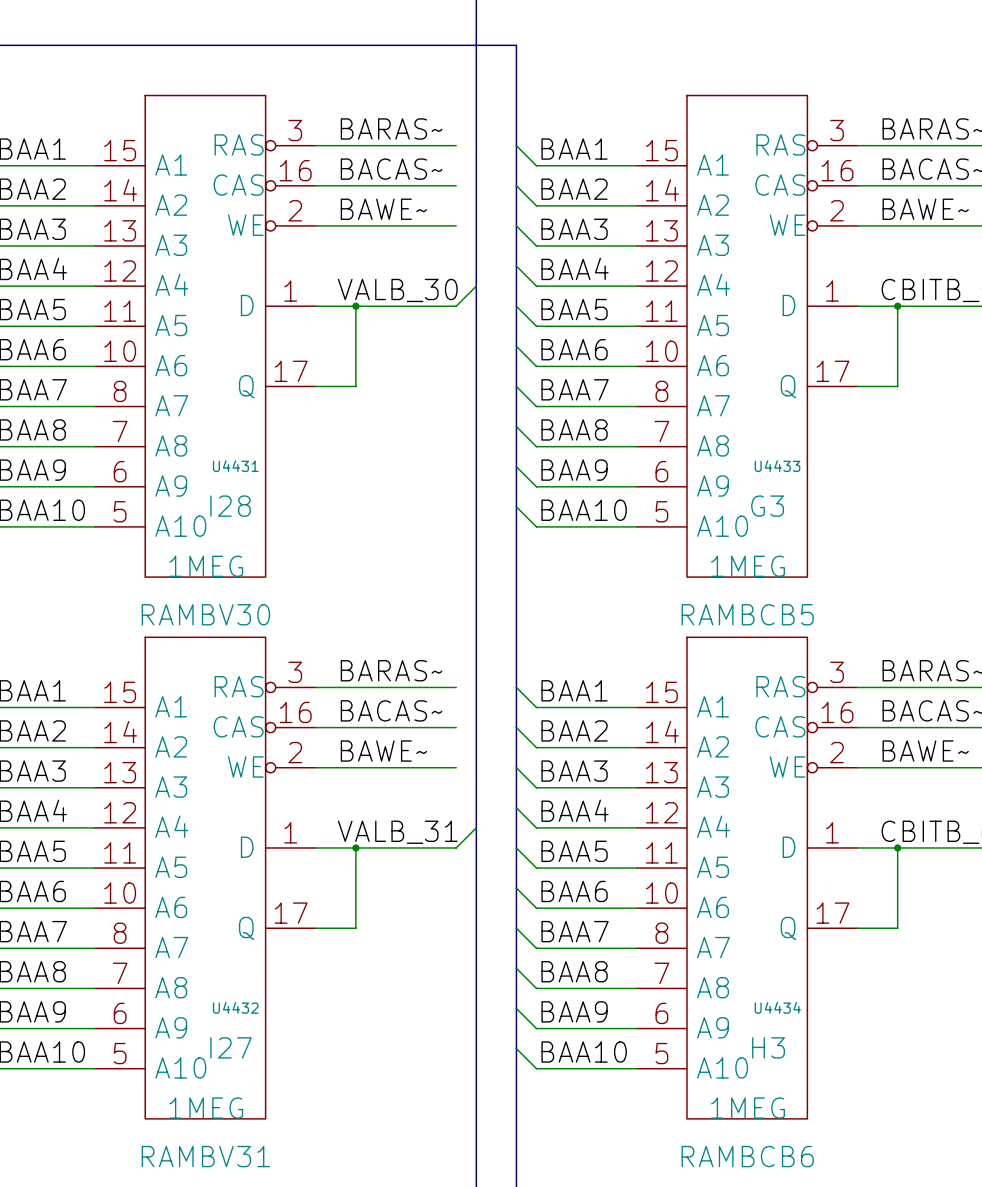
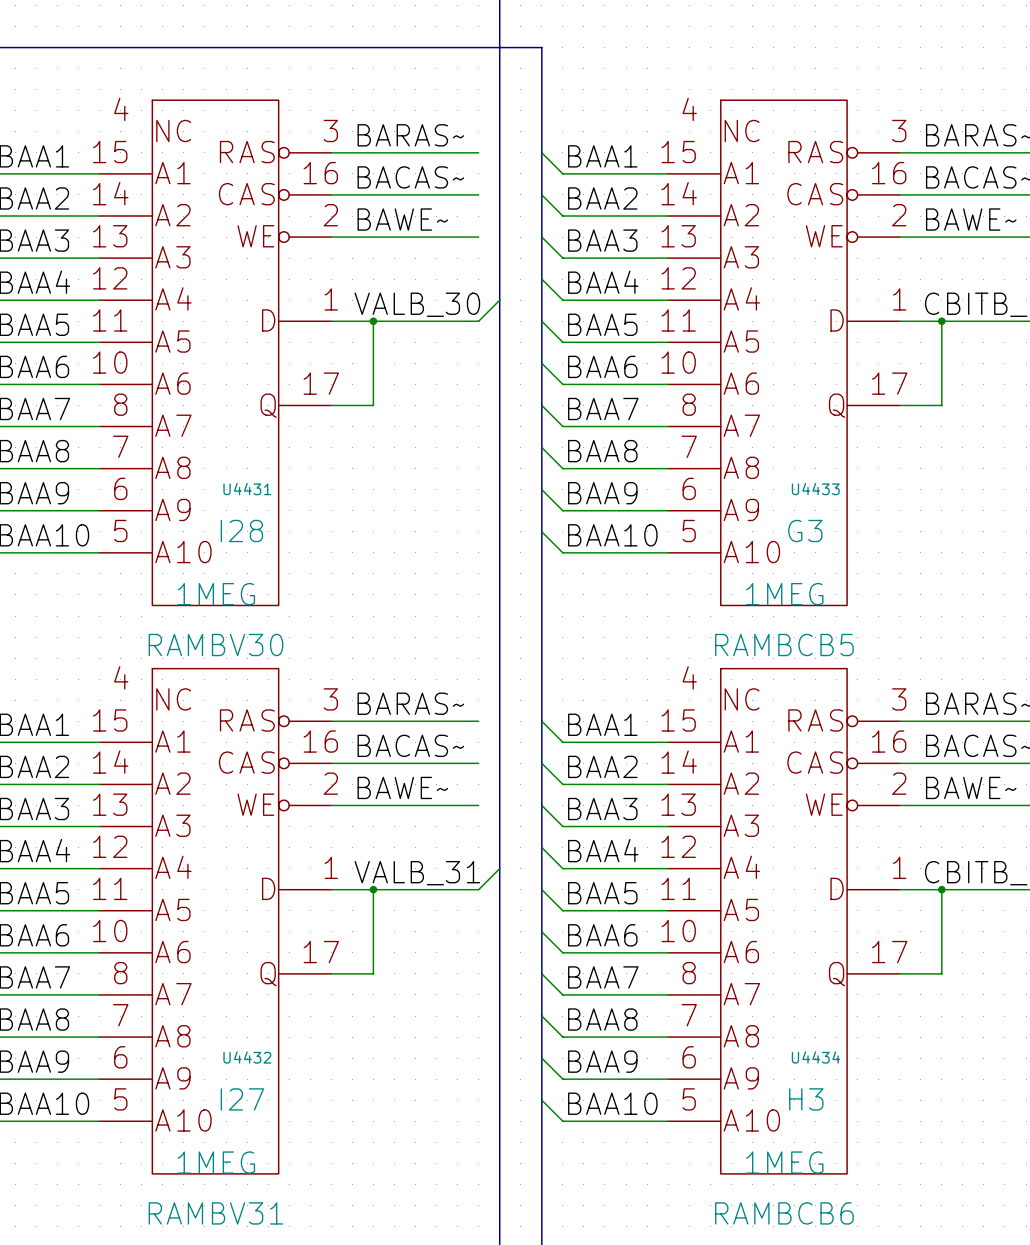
U4431 symbol: [95, 95, 316, 578] -> [99, 100, 332, 606]
U4433 symbol: [636, 95, 858, 578] -> [668, 100, 900, 606]
U4432 symbol: [95, 637, 316, 1119] -> [99, 668, 332, 1174]
U4434 symbol: [636, 637, 858, 1119] -> [668, 668, 900, 1174]

